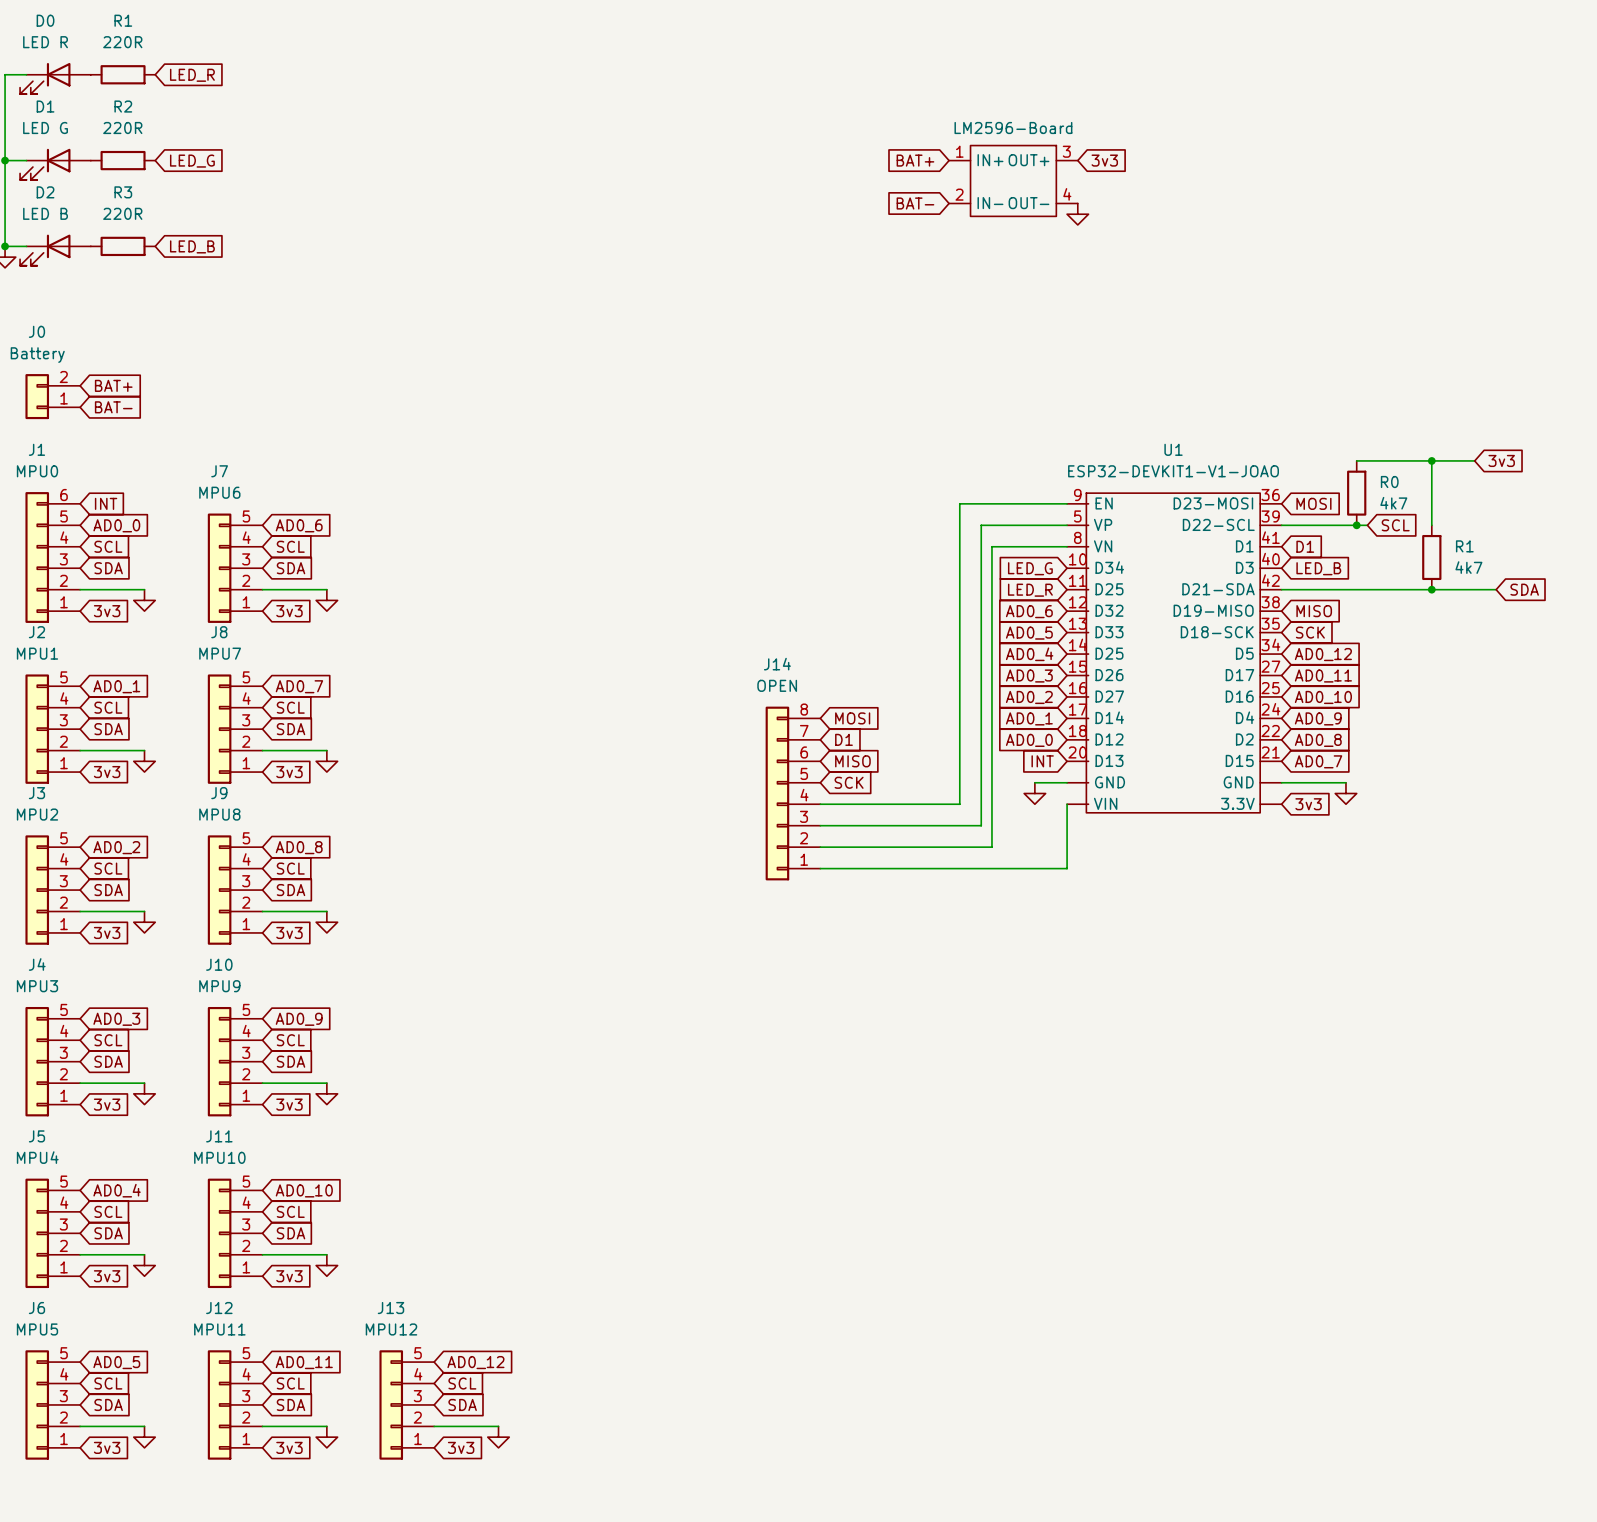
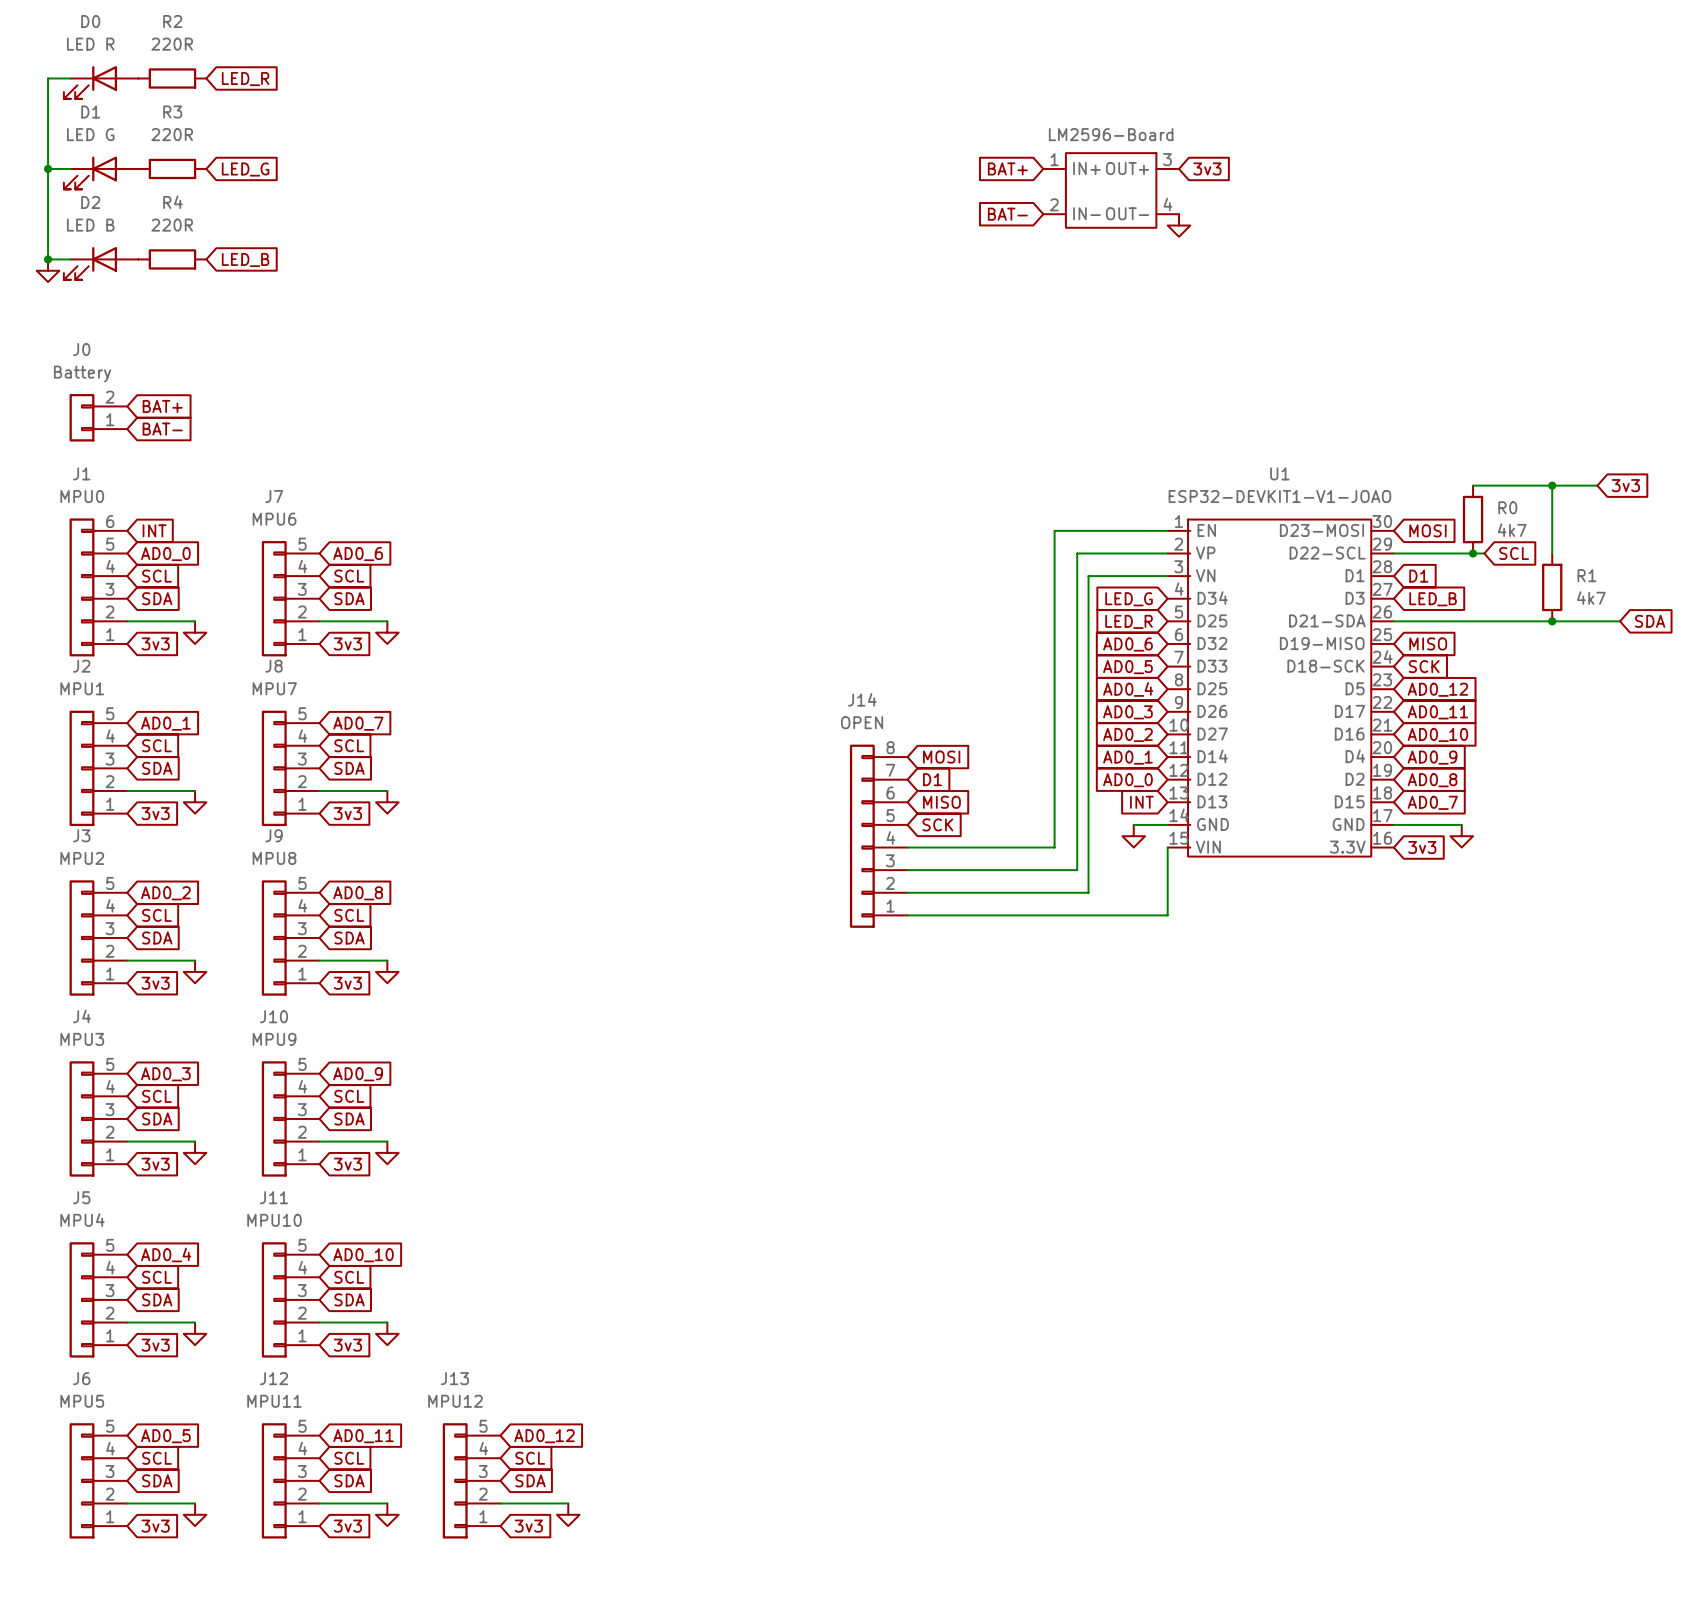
R1 name: R1 (123, 20) -> R2 (172, 21)
R2 name: R2 (123, 106) -> R3 (172, 111)
R3 name: R3 (123, 192) -> R4 (173, 202)
U1 symbol: [1067, 493, 1282, 813] -> [1167, 519, 1394, 857]

